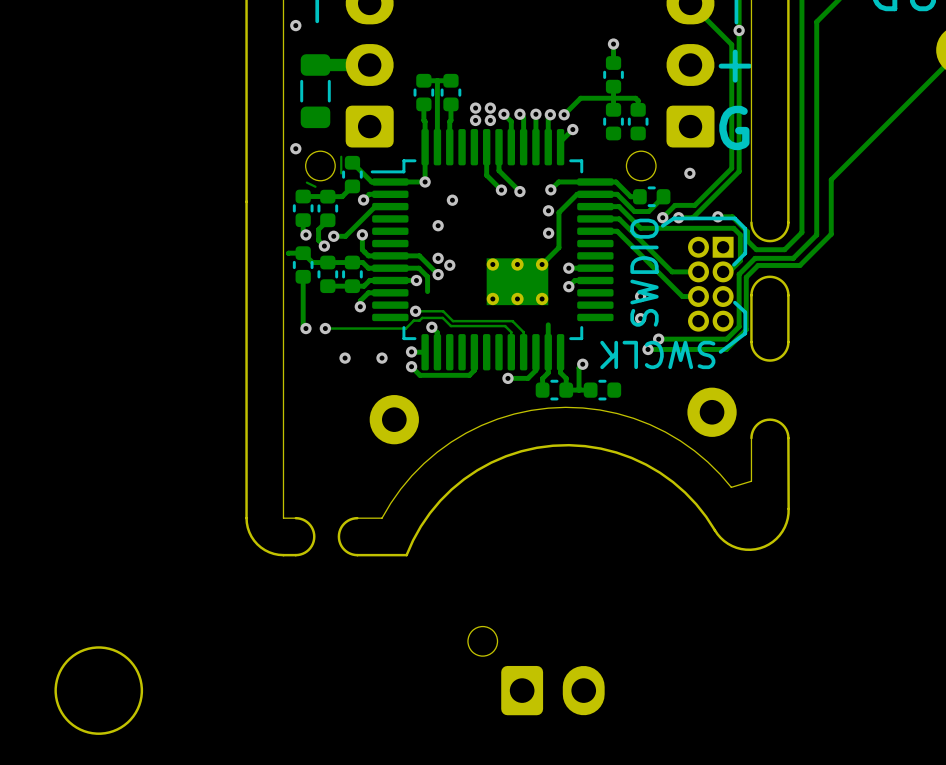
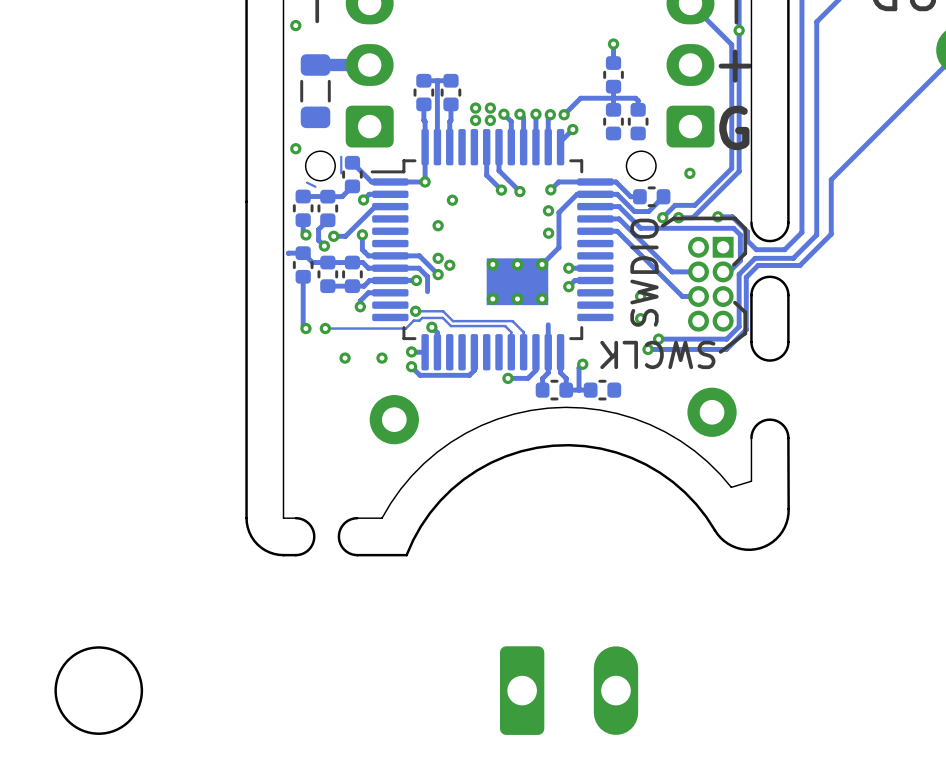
part: (536, 670) -> none
part: none -> (569, 690)

